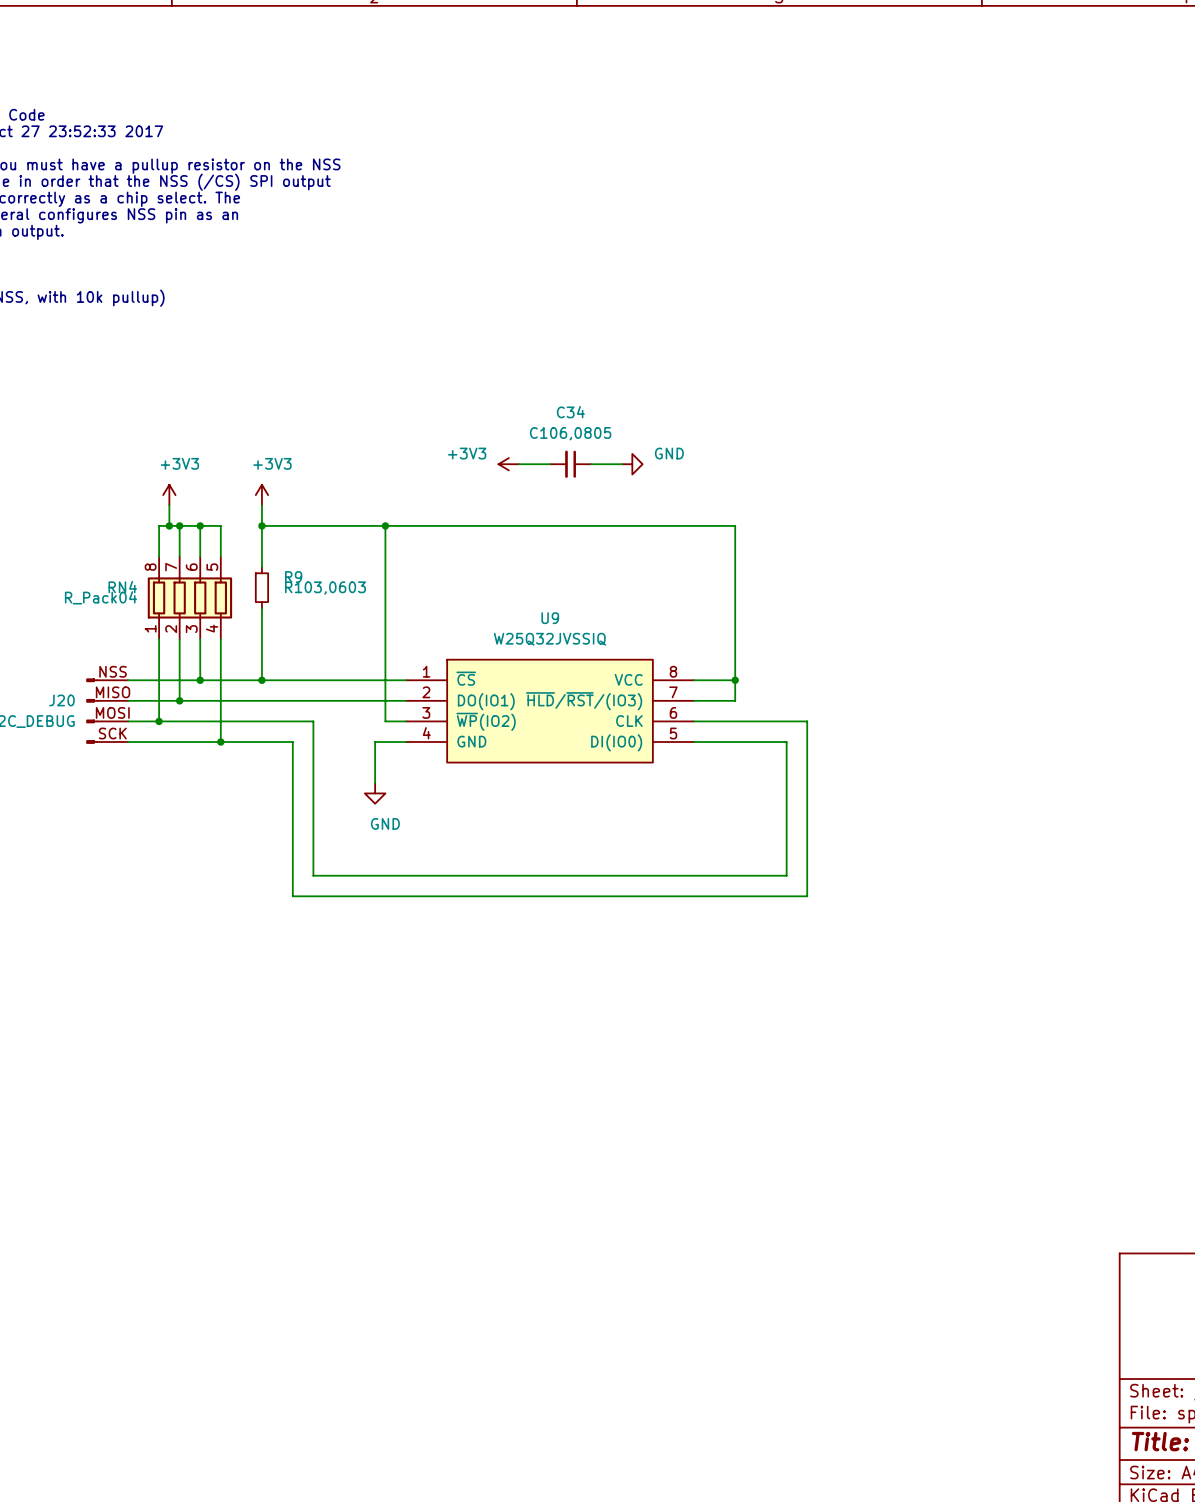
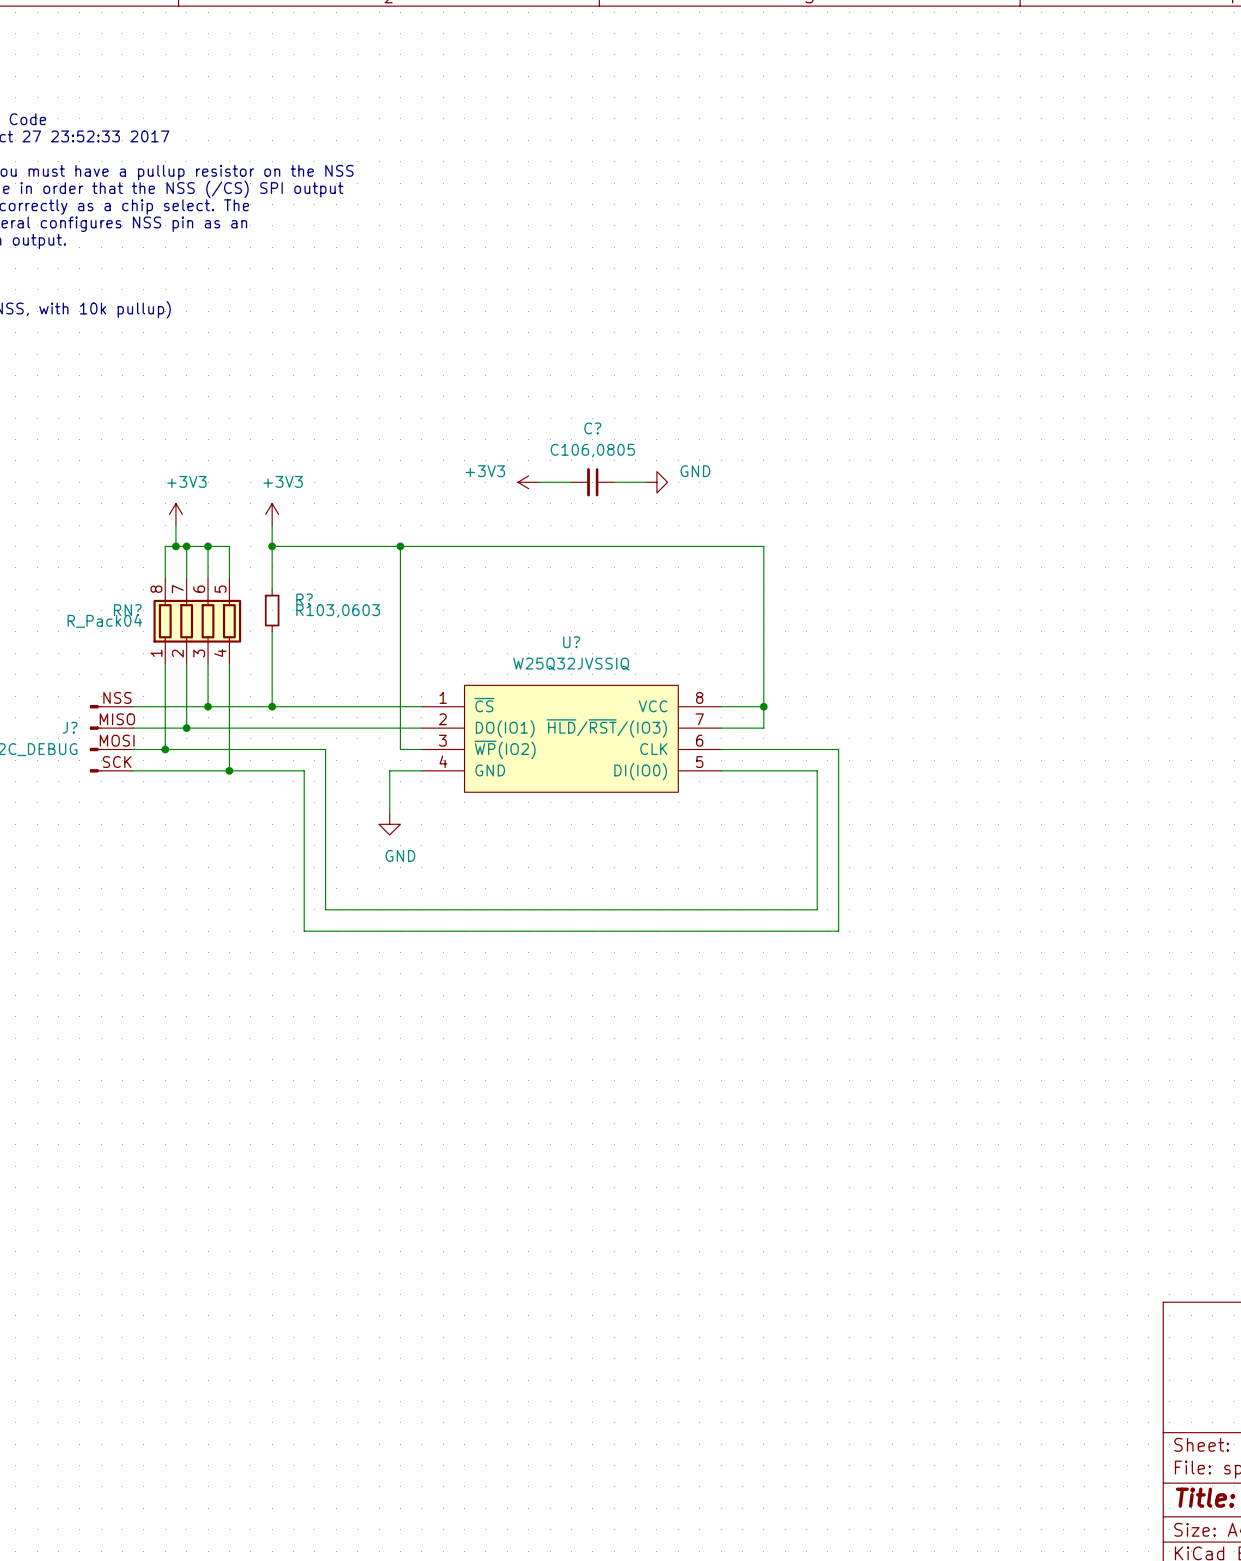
C34 name: C34 (570, 412) -> C? (592, 428)
R9 name: R9 (293, 577) -> R? (304, 599)
RN4 name: RN4 (122, 587) -> RN? (127, 610)
U9 name: U9 (550, 618) -> U? (571, 642)
J20 name: J20 (62, 700) -> J? (70, 727)

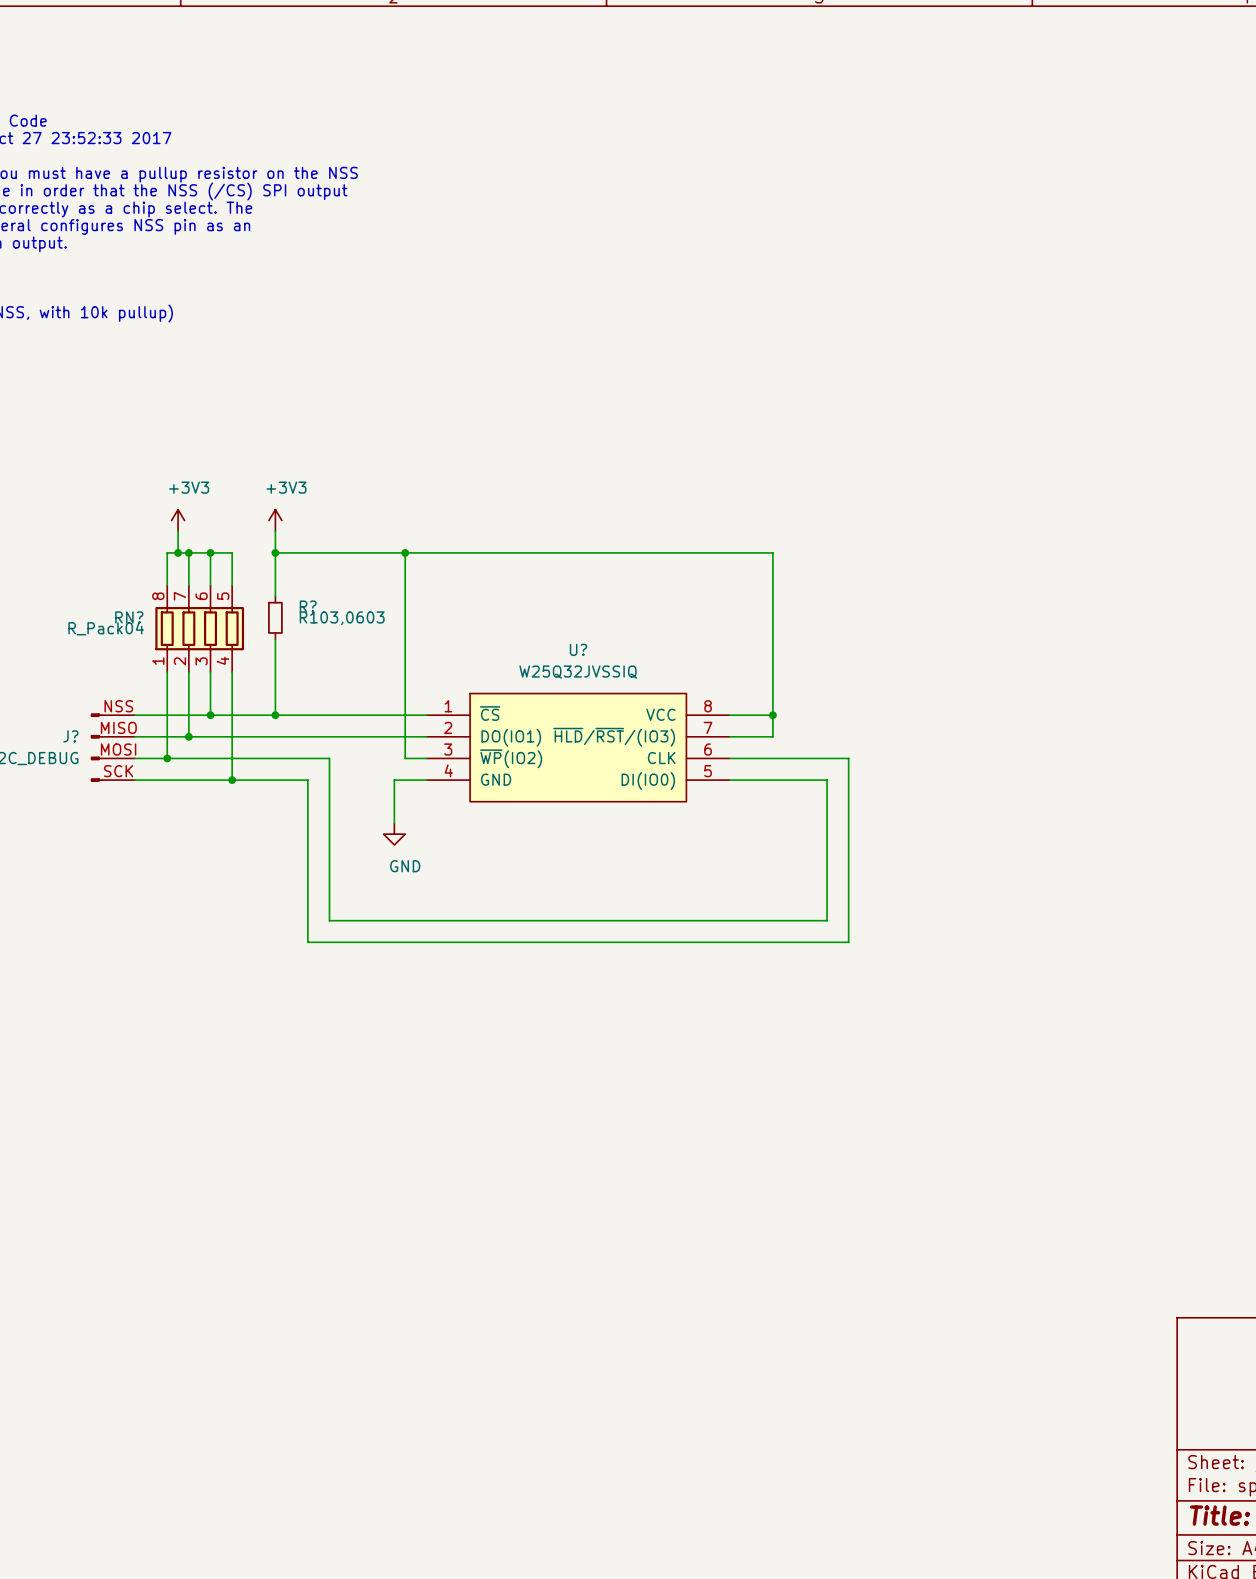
power symbol: +3V3 (528, 482) -> none
wire: (539, 482) (571, 482) -> none
C?: C106,0805 (592, 482) -> none
wire: (614, 482) (646, 482) -> none
power symbol: GND (656, 482) -> none

